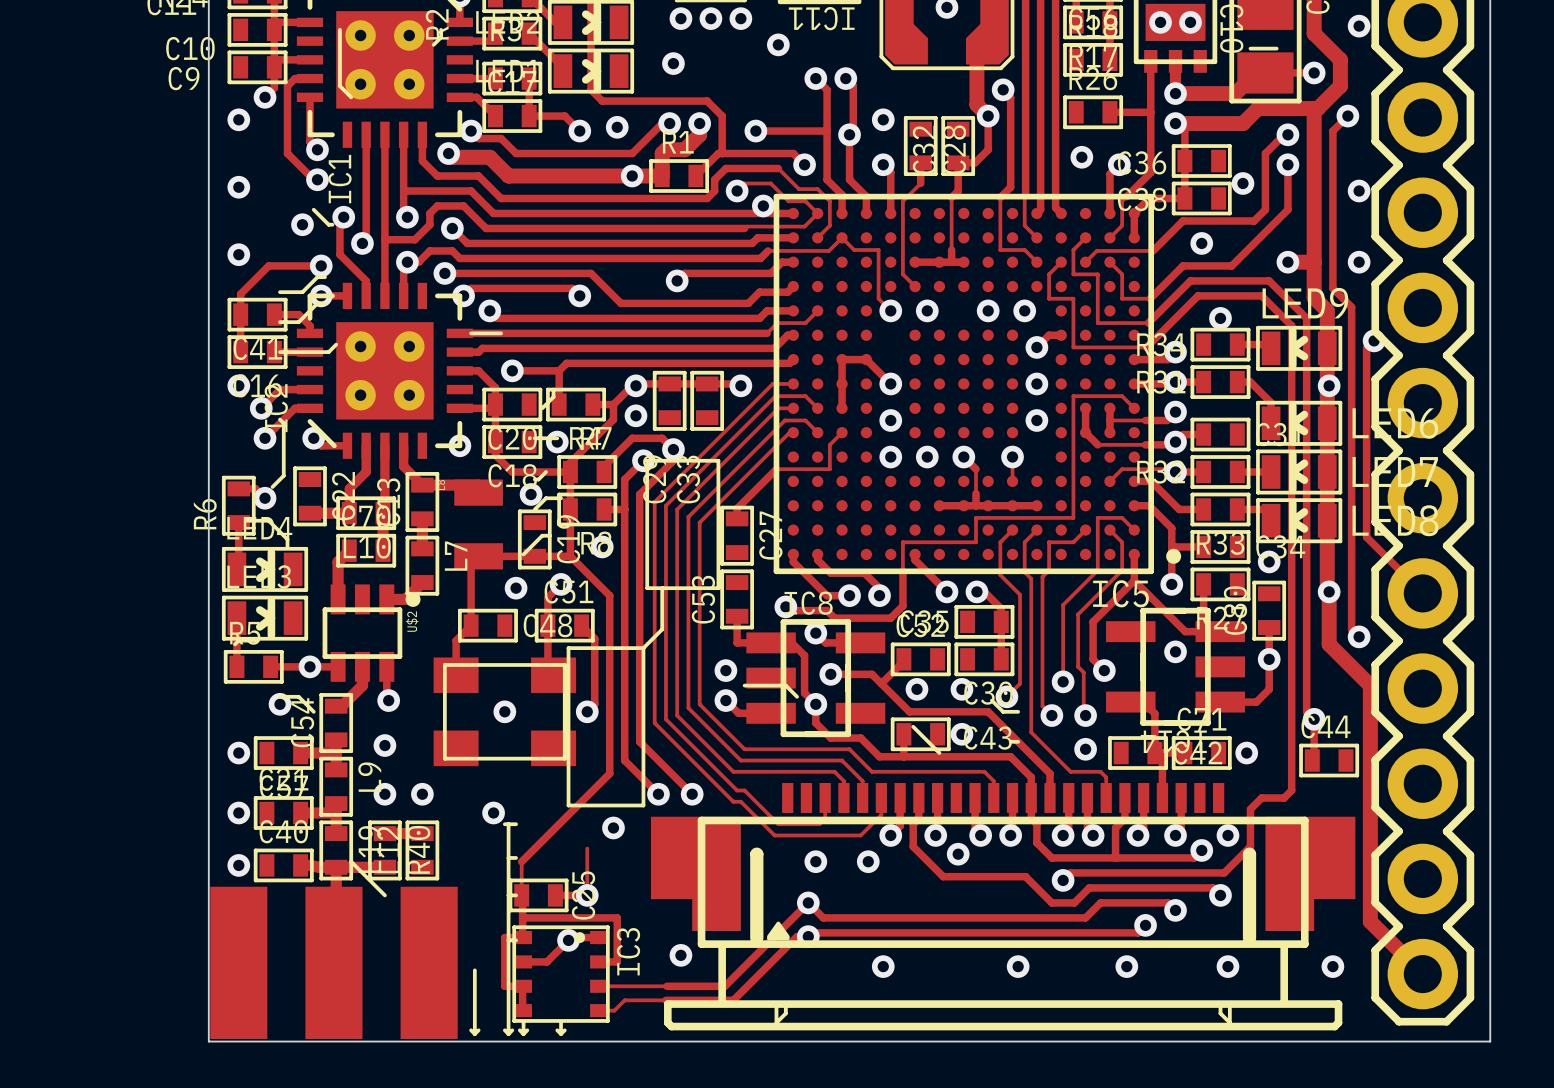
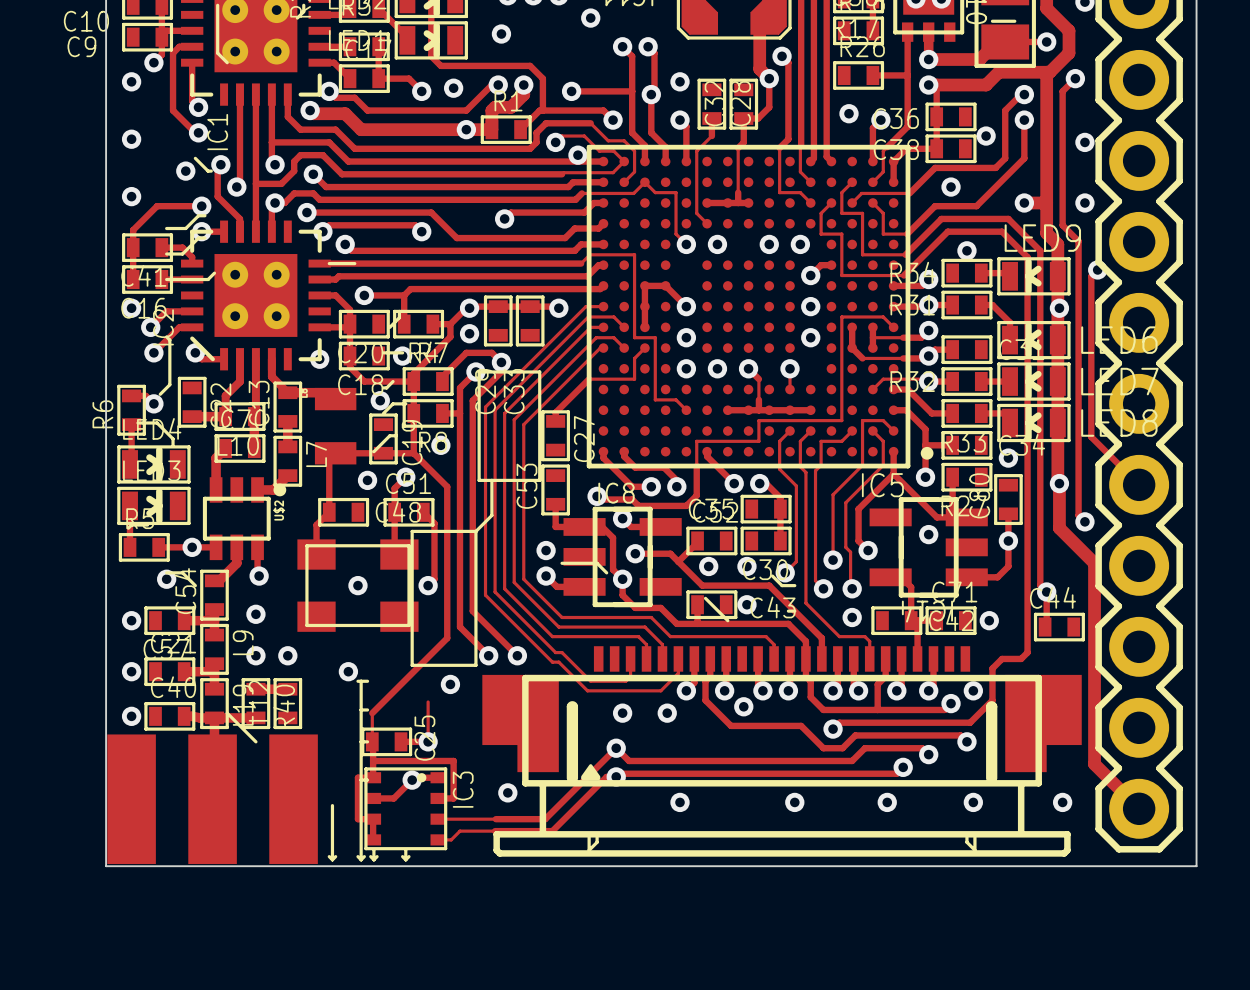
track: (817, 310) (805, 323) -> (686, 410) (676, 399) (655, 399) (655, 337) (634, 337) (634, 254) (613, 254)

